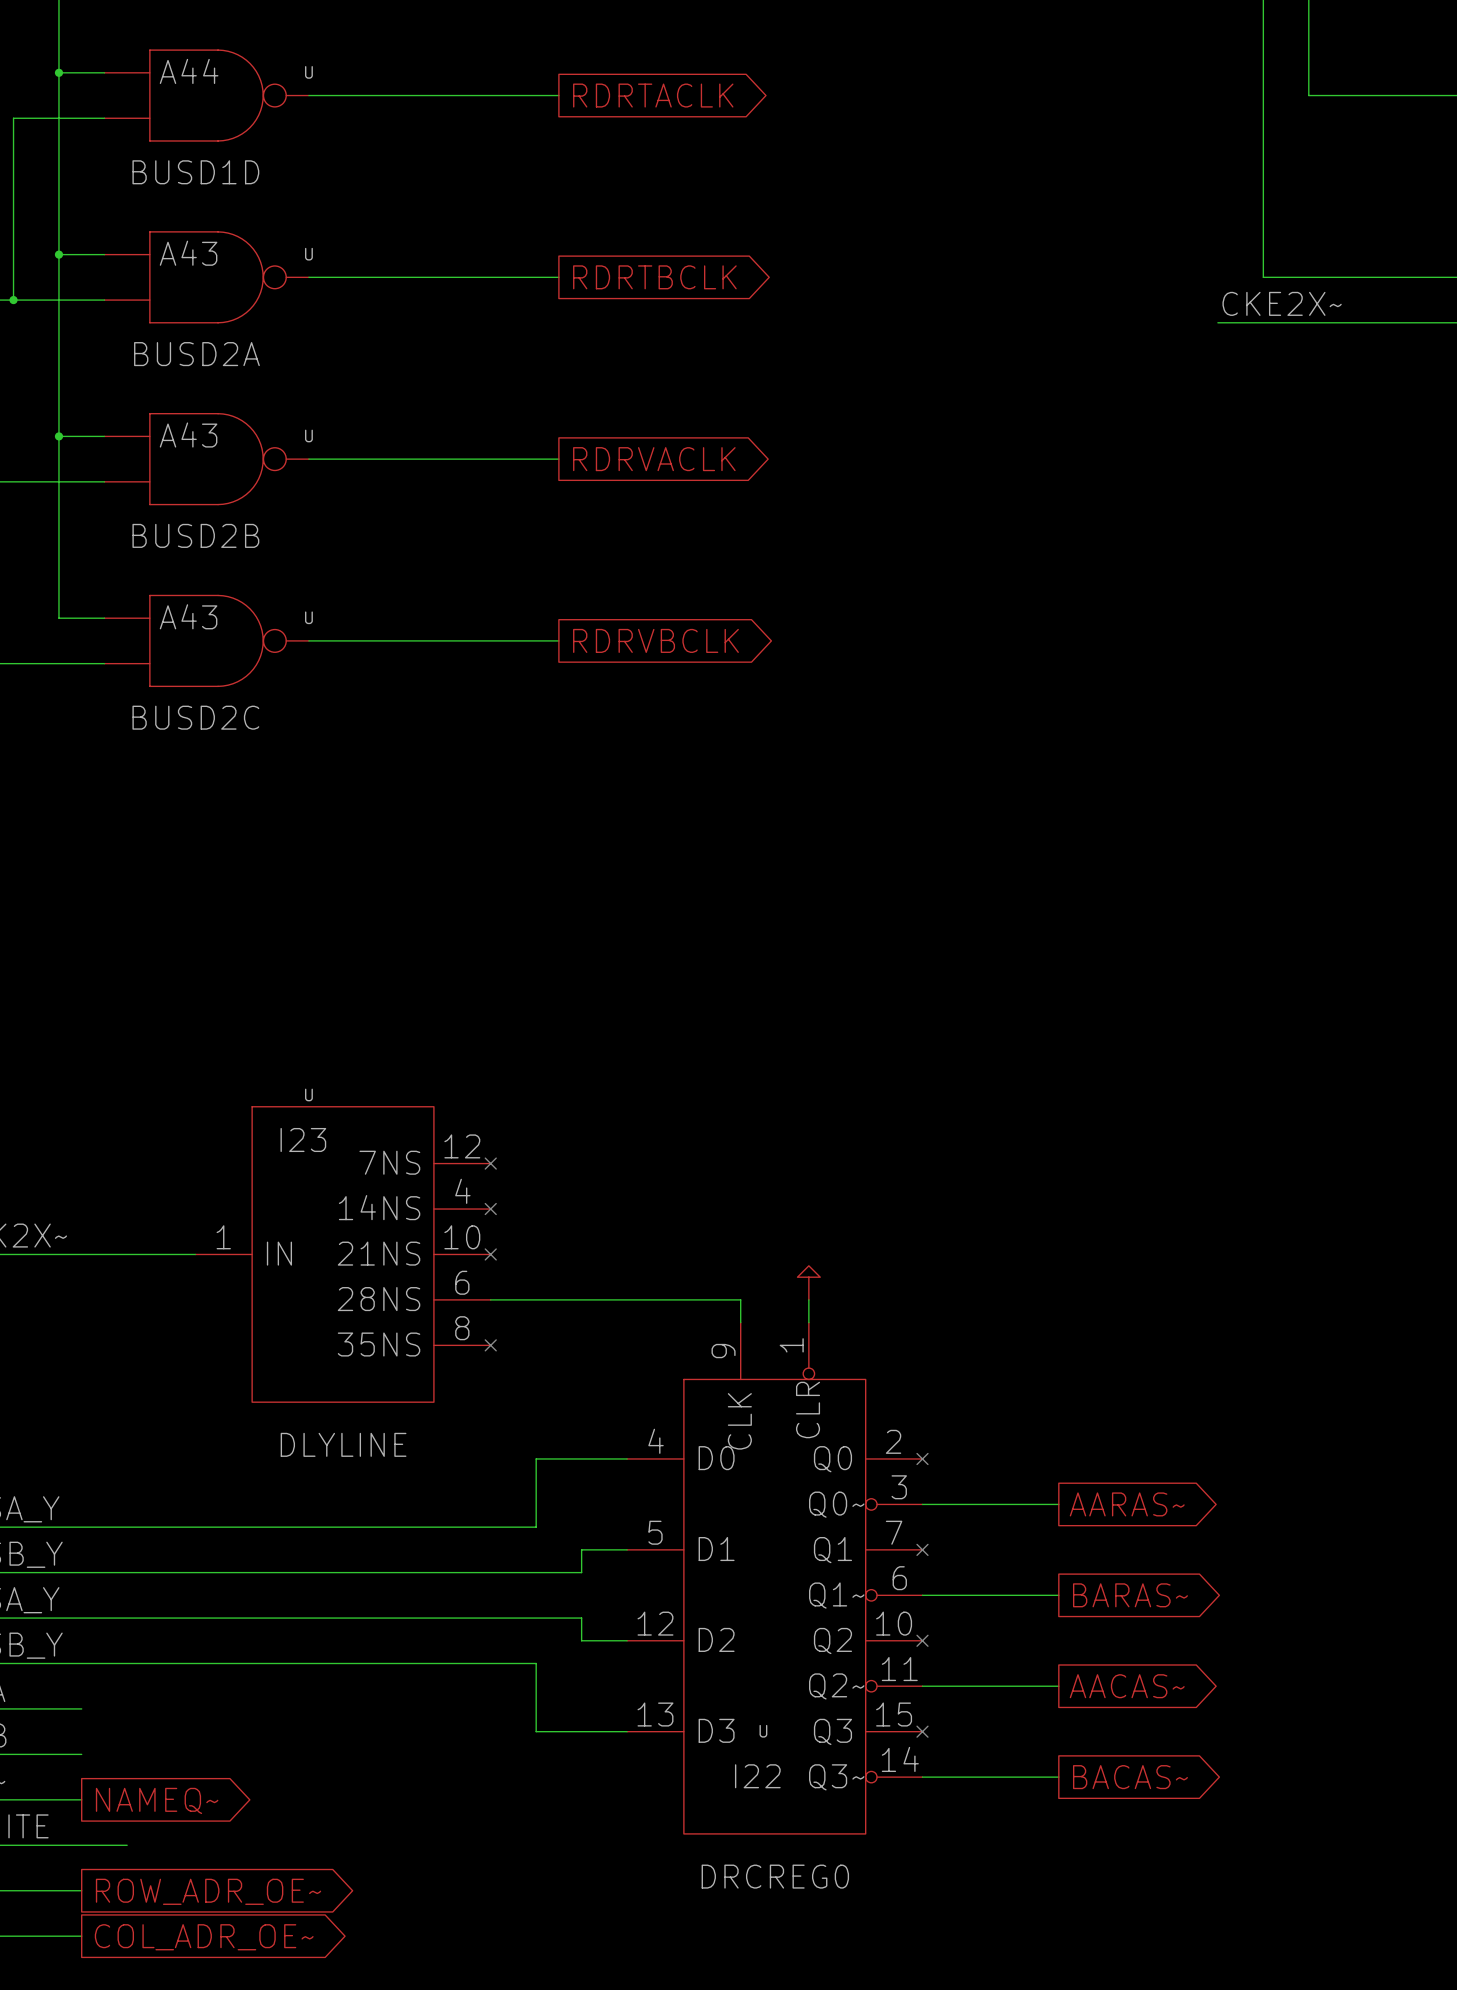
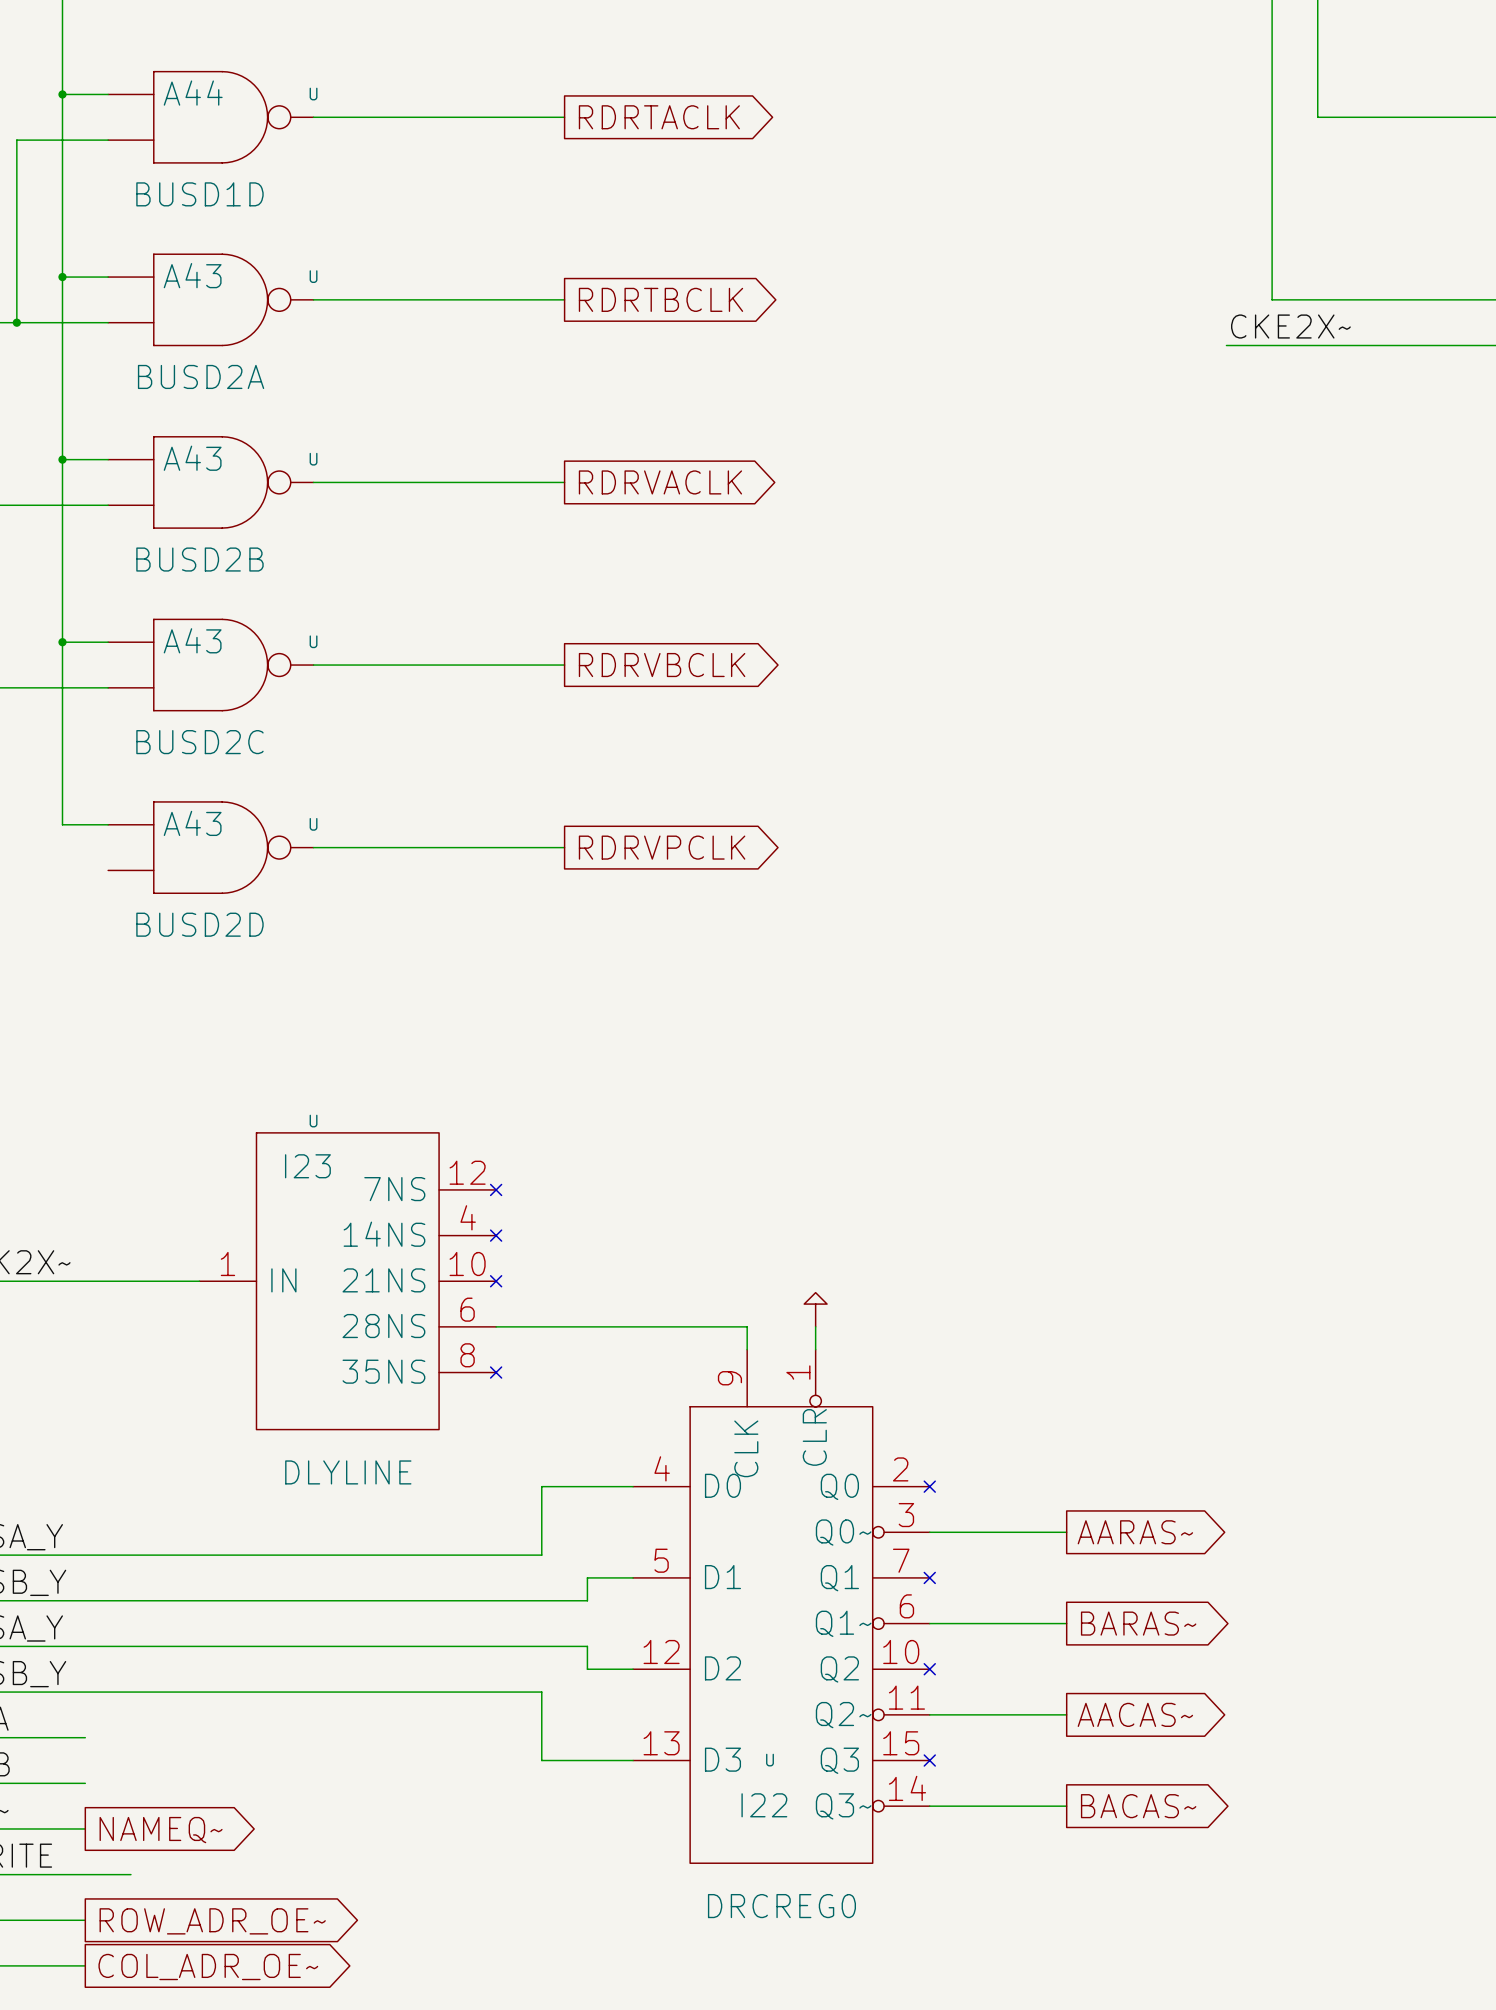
wire: none -> (62, 642) (62, 824) (108, 824)
junction: none -> (62, 642)
U: none -> (210, 847)
wire: none -> (313, 847) (564, 847)
global label: none -> RDRVPCLK (662, 847)

